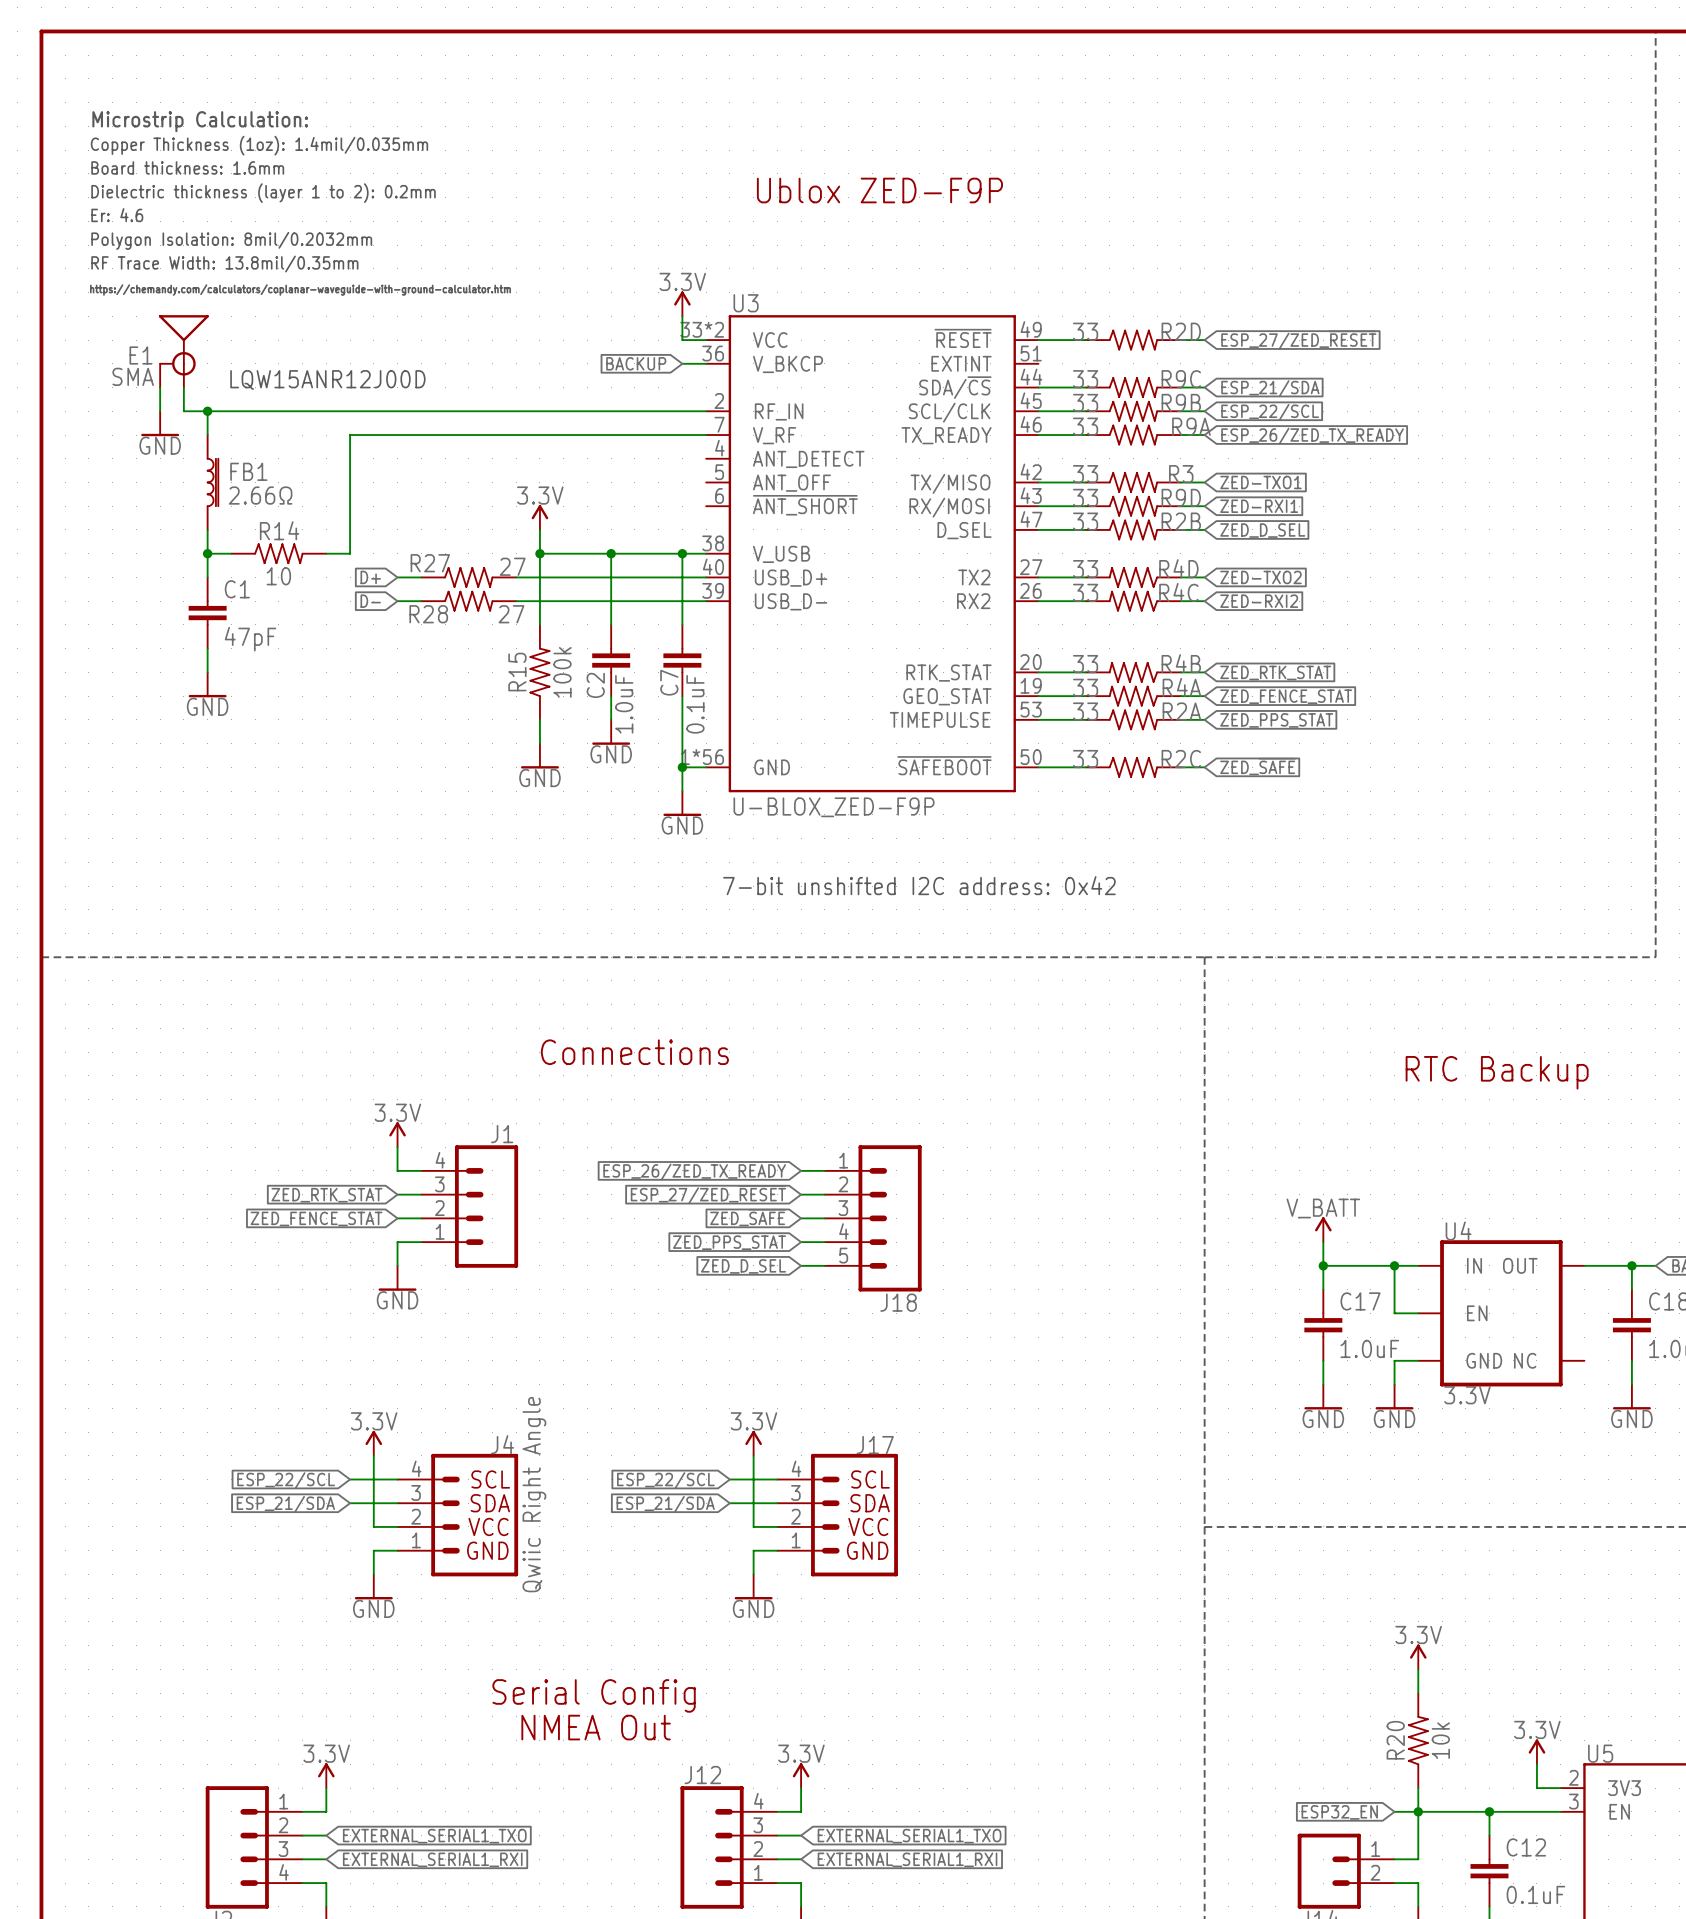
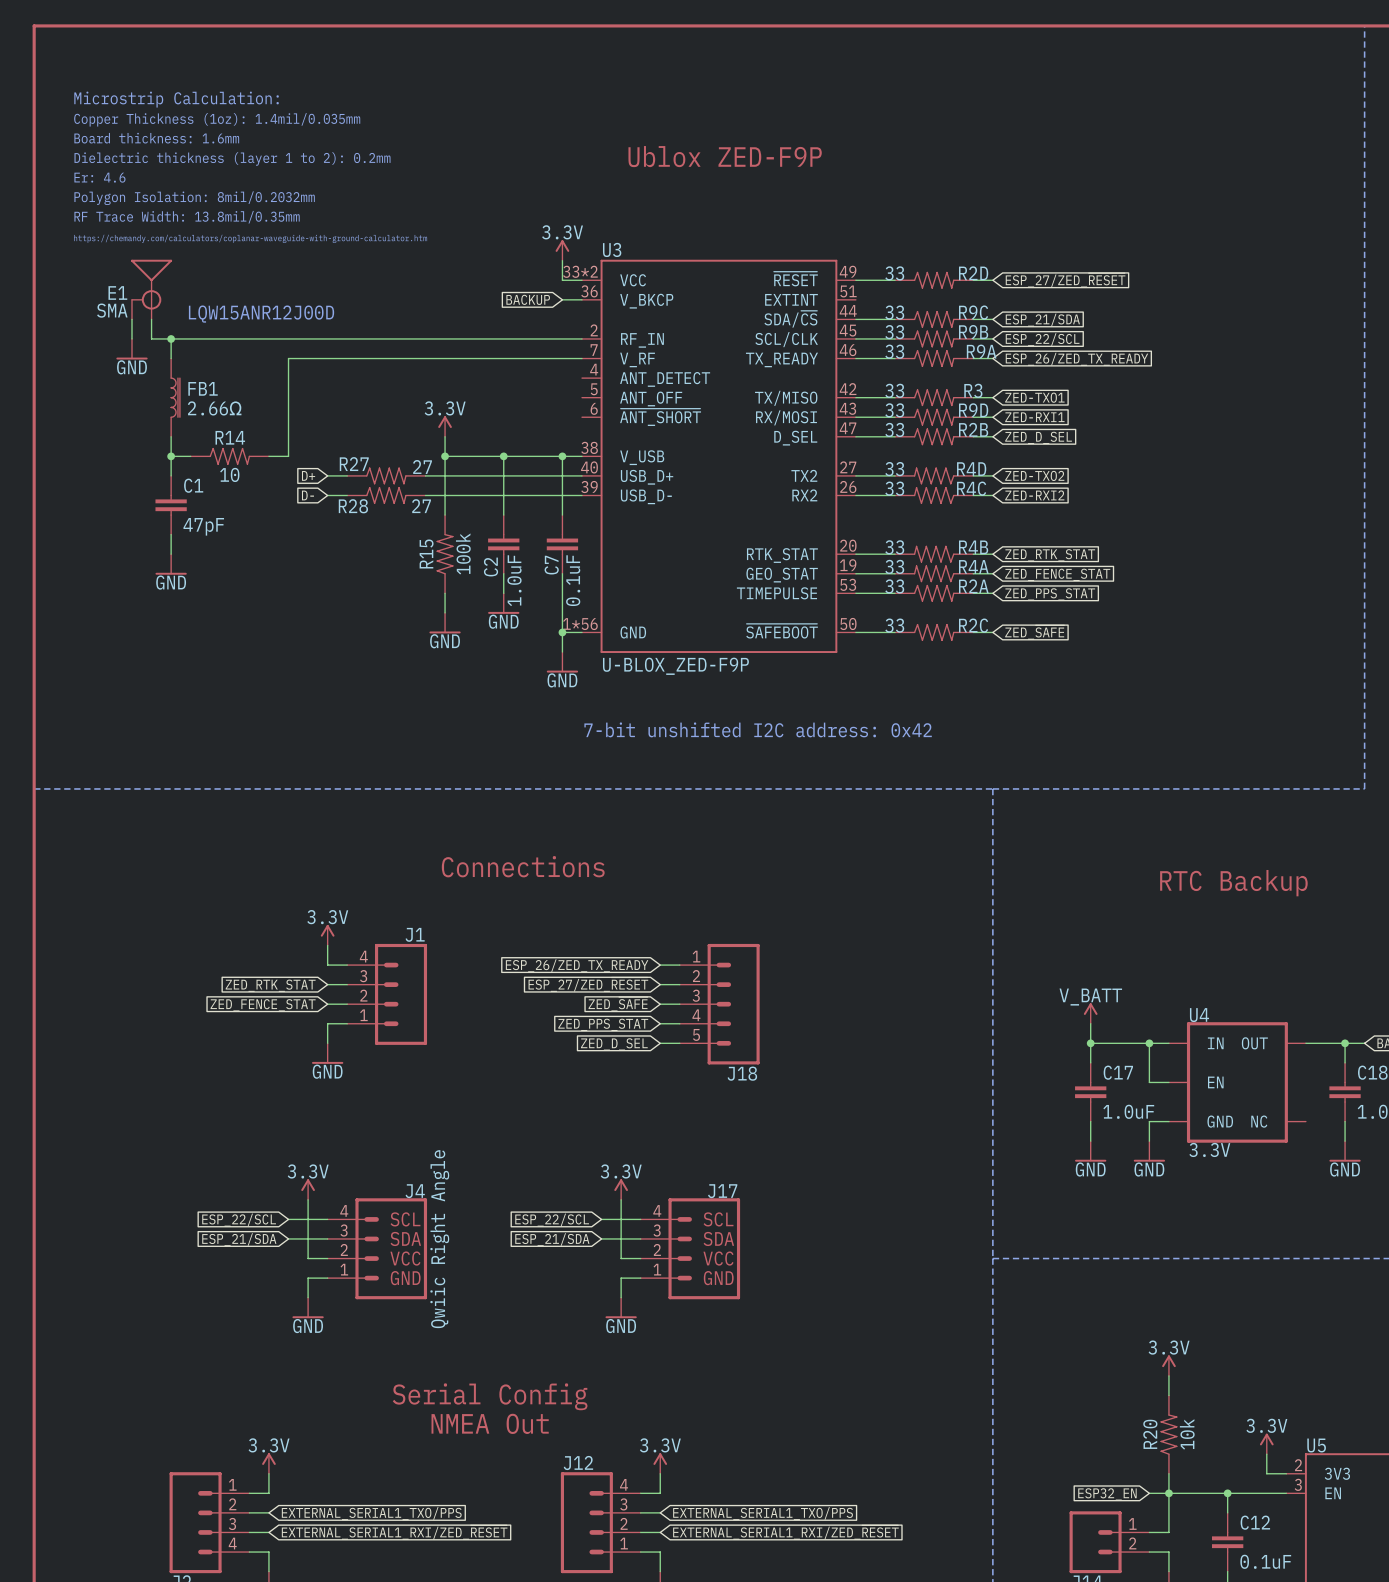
global label: EXTERNAL_SERIAL1_TXO (434, 1836) -> EXTERNAL_SERIAL1_TXO/PPS (371, 1513)
global label: EXTERNAL_SERIAL1_TXO (909, 1836) -> EXTERNAL_SERIAL1_TXO/PPS (763, 1513)
global label: EXTERNAL_SERIAL1_RXI (432, 1859) -> EXTERNAL_SERIAL1_RXI/ZED_~{RESET} (394, 1532)
global label: EXTERNAL_SERIAL1_RXI (907, 1859) -> EXTERNAL_SERIAL1_RXI/ZED_~{RESET} (785, 1532)

